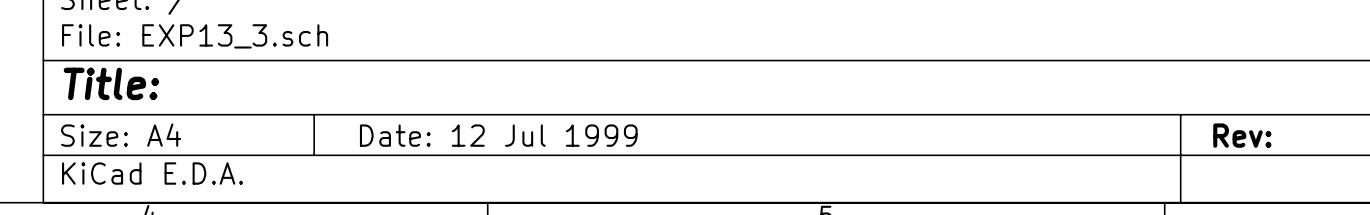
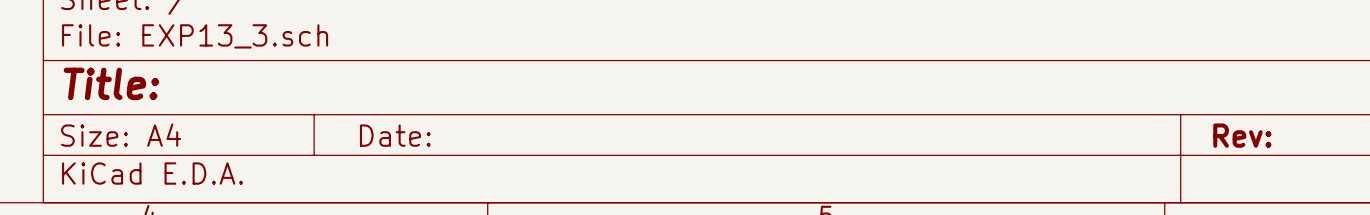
title block: Date: 12 Jul 1999 (498, 135) -> Date: (395, 135)

